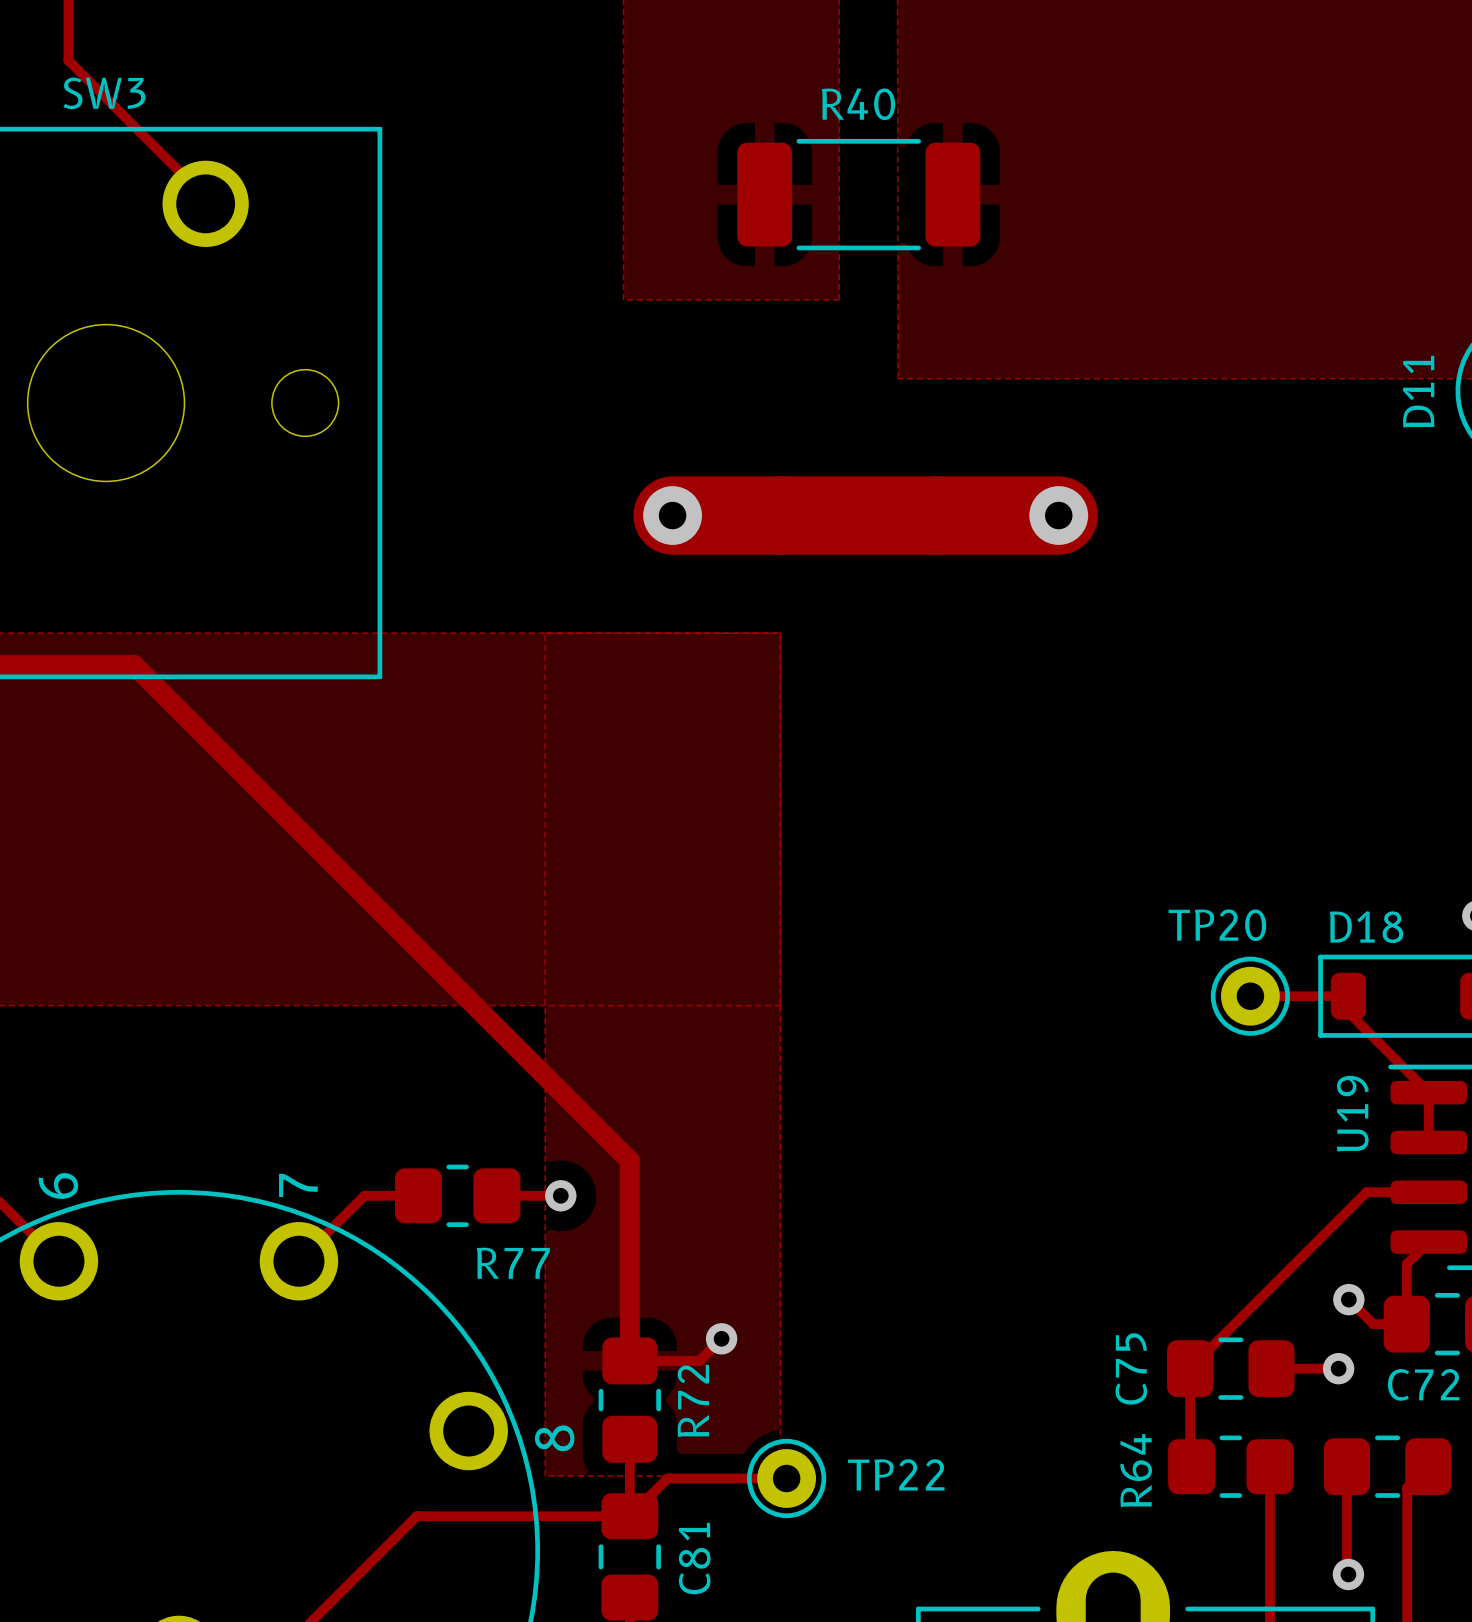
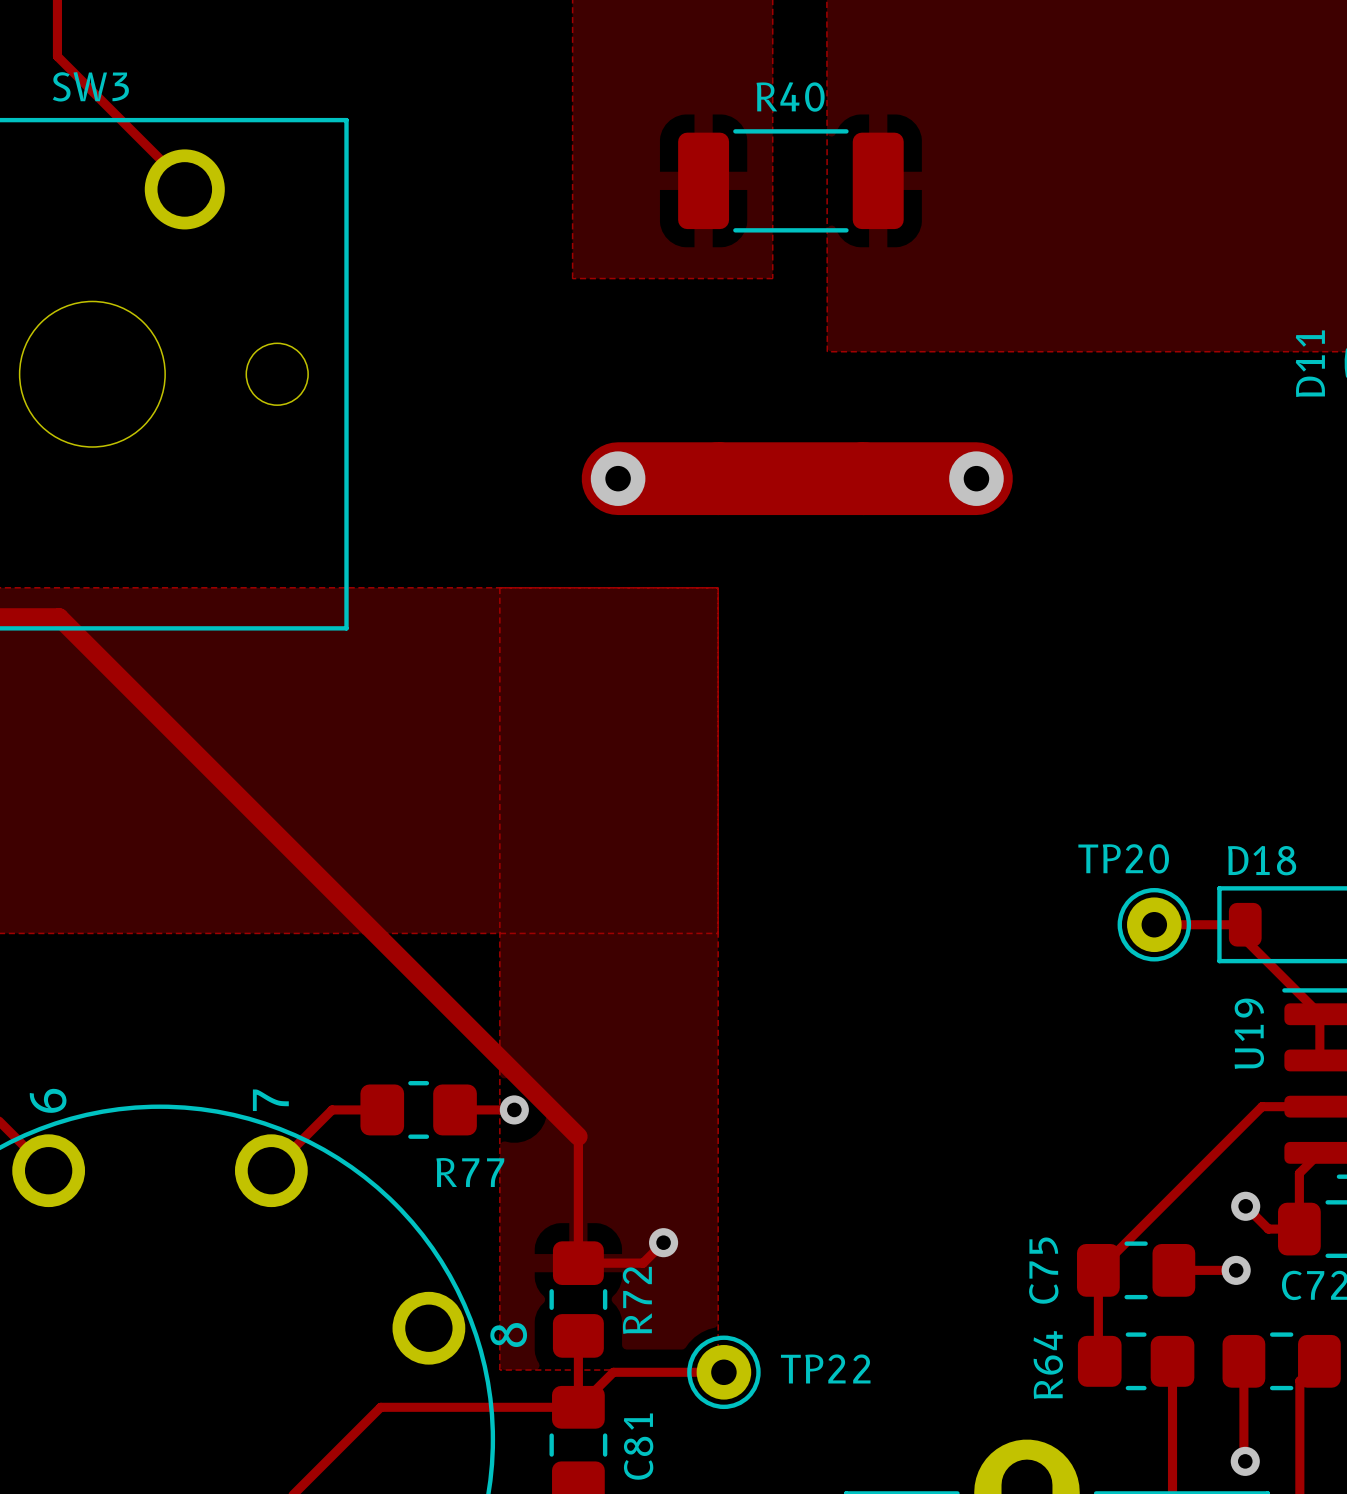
track: (70, 665) (134, 665) (629, 1160) (629, 1224) -> (59, 617) (578, 1136)
track width: thick (629, 1224) (629, 1360) -> thin (578, 1136) (578, 1263)

